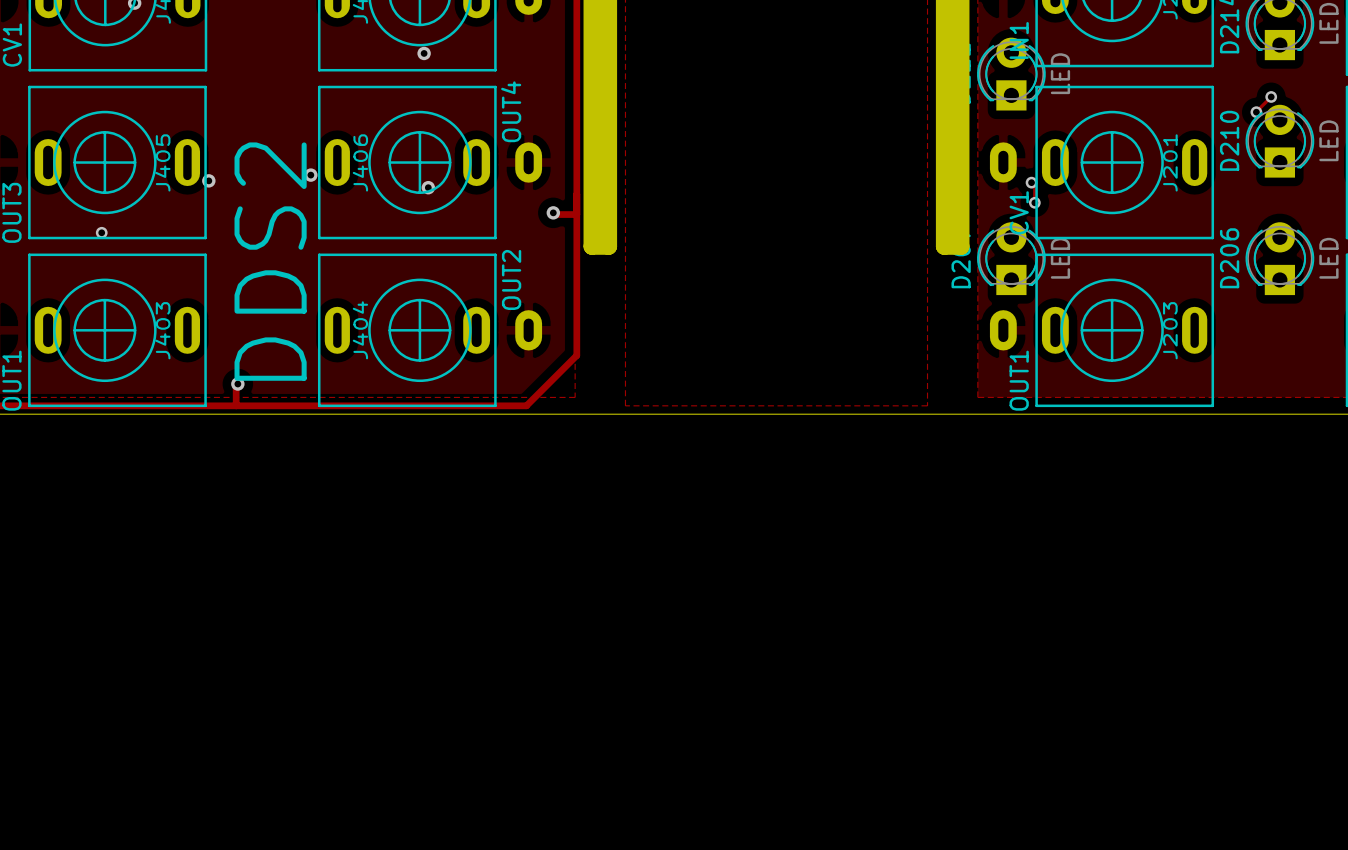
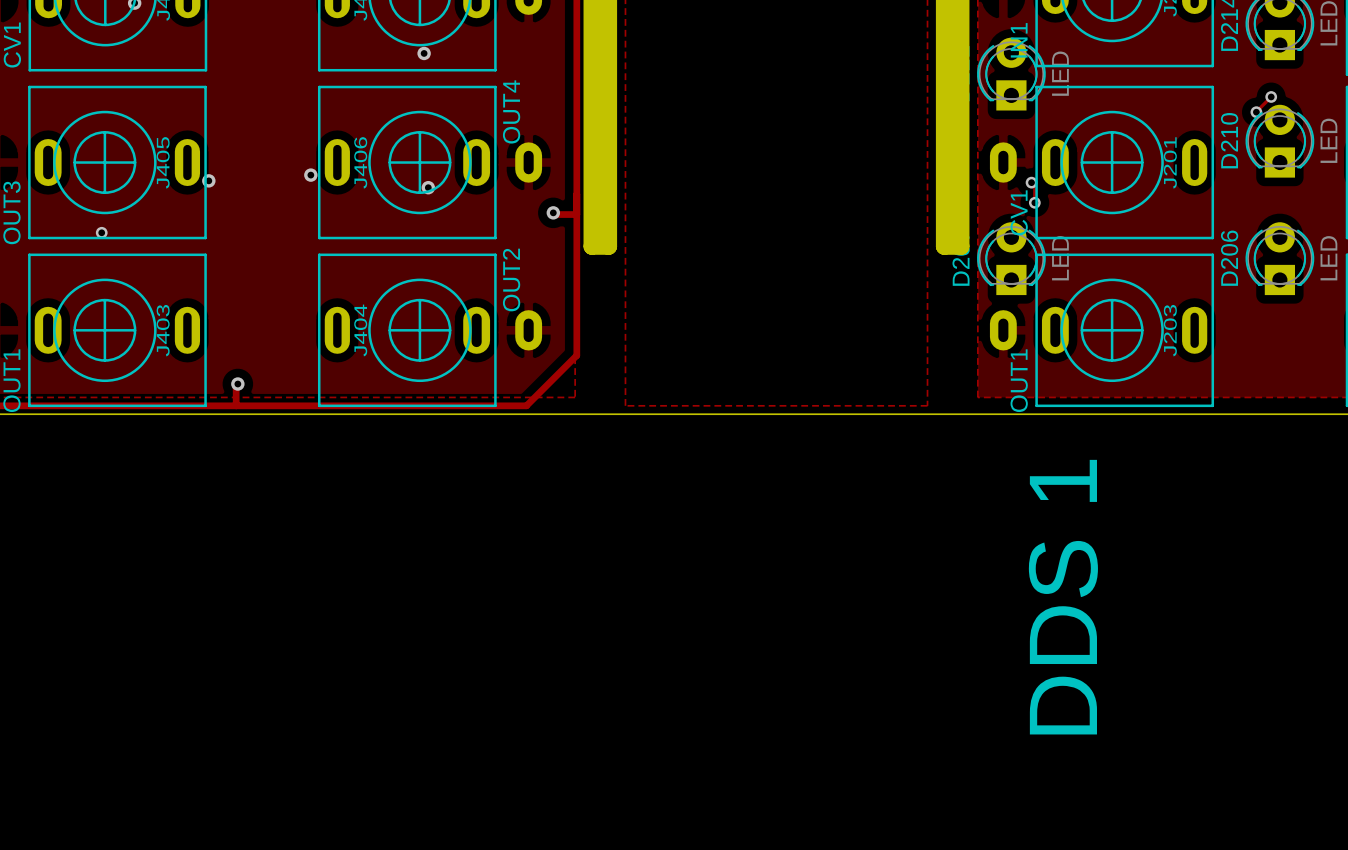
text: DDS2 (270, 261) -> none
text: none -> DDS 1 (1063, 597)

